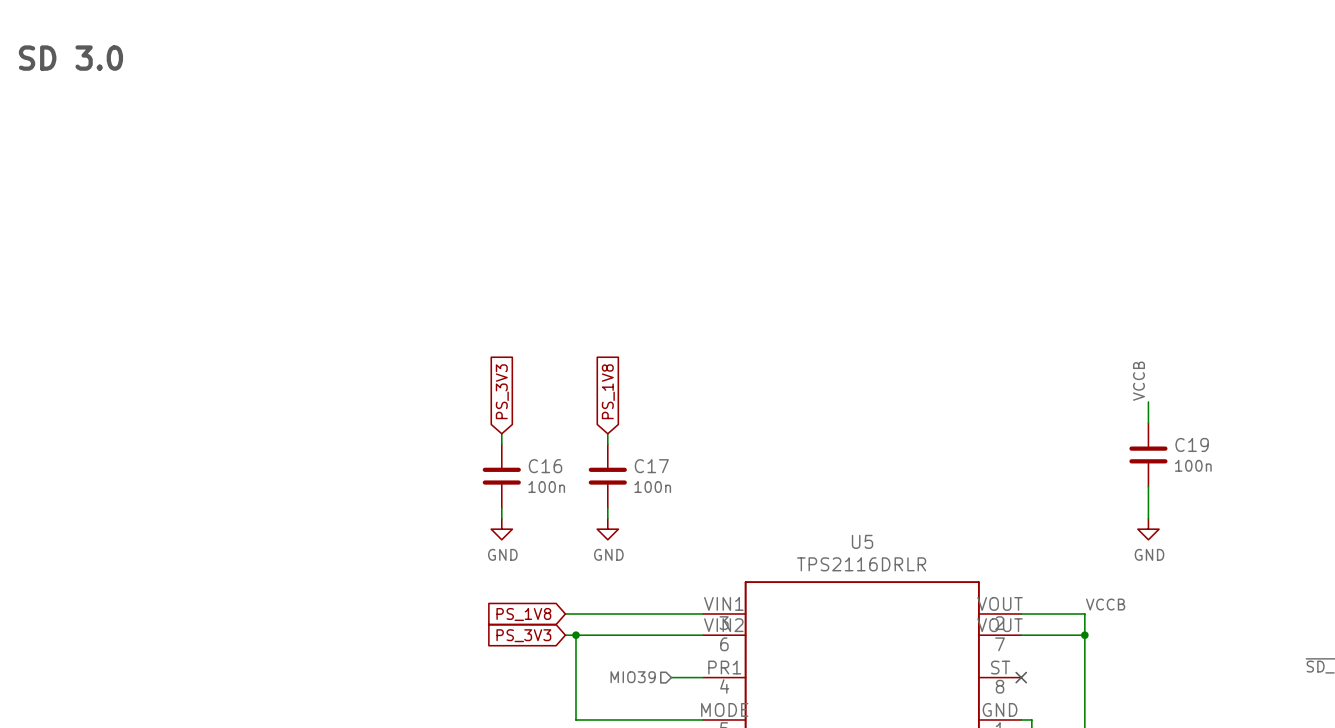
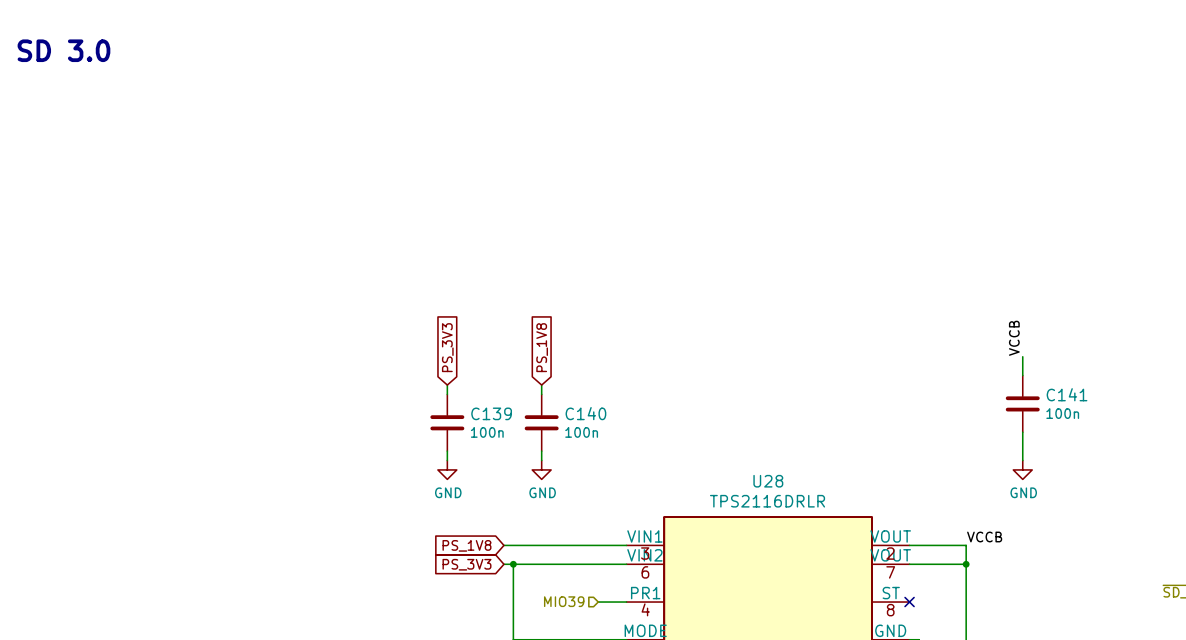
C19 name: C19 (1192, 444) -> C141 (1067, 394)
C16 name: C16 (545, 466) -> C139 (491, 413)
C17 name: C17 (651, 466) -> C140 (585, 413)
U5 name: U5 (862, 541) -> U28 (768, 481)

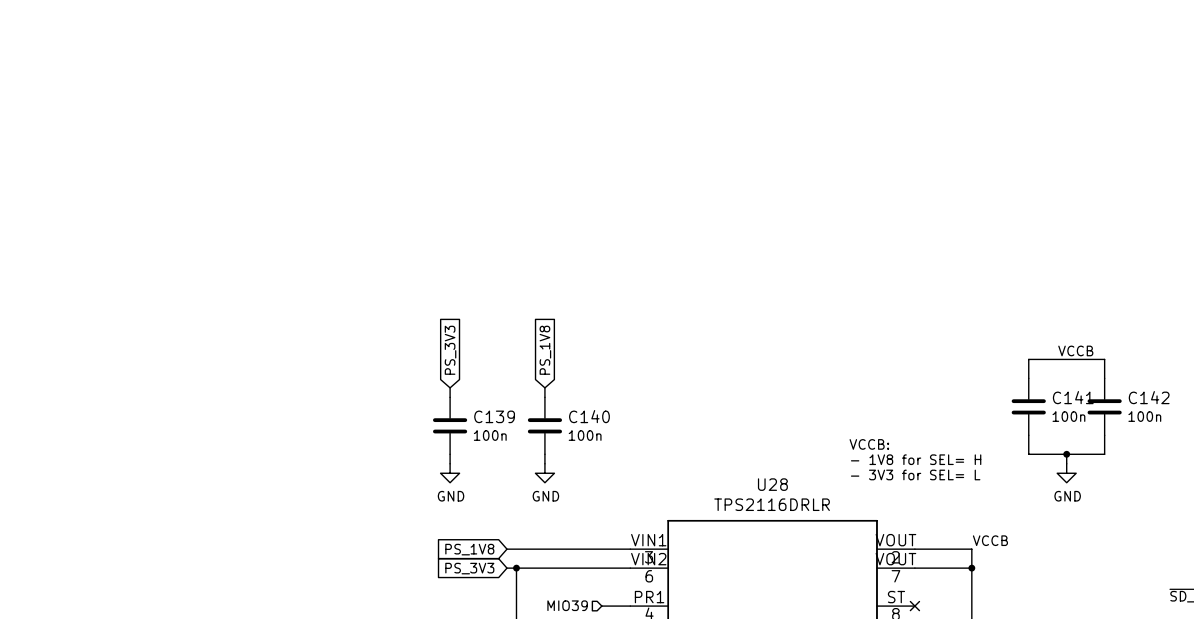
text: SD 3.0 (63, 50) -> none
label rotation: 0° (1014, 338) -> 90° clockwise (1075, 350)
label position: VCCB (1014, 338) -> VCCB (1075, 350)
wire: none -> (1028, 359) (1104, 359) (1104, 378)
C142: none -> (1104, 406)
text: none -> VCCB: (869, 444)
wire: (1022, 451) (1022, 460) -> (1028, 454) (1104, 454) (1104, 435)
wire: none -> (1066, 454) (1066, 463)
junction: none -> (1066, 454)
text: none -> - 1V8 for SEL= H (916, 459)
power symbol position: GND (1022, 469) -> GND (1066, 473)
text: none -> - 3V3 for SEL= L (915, 474)

